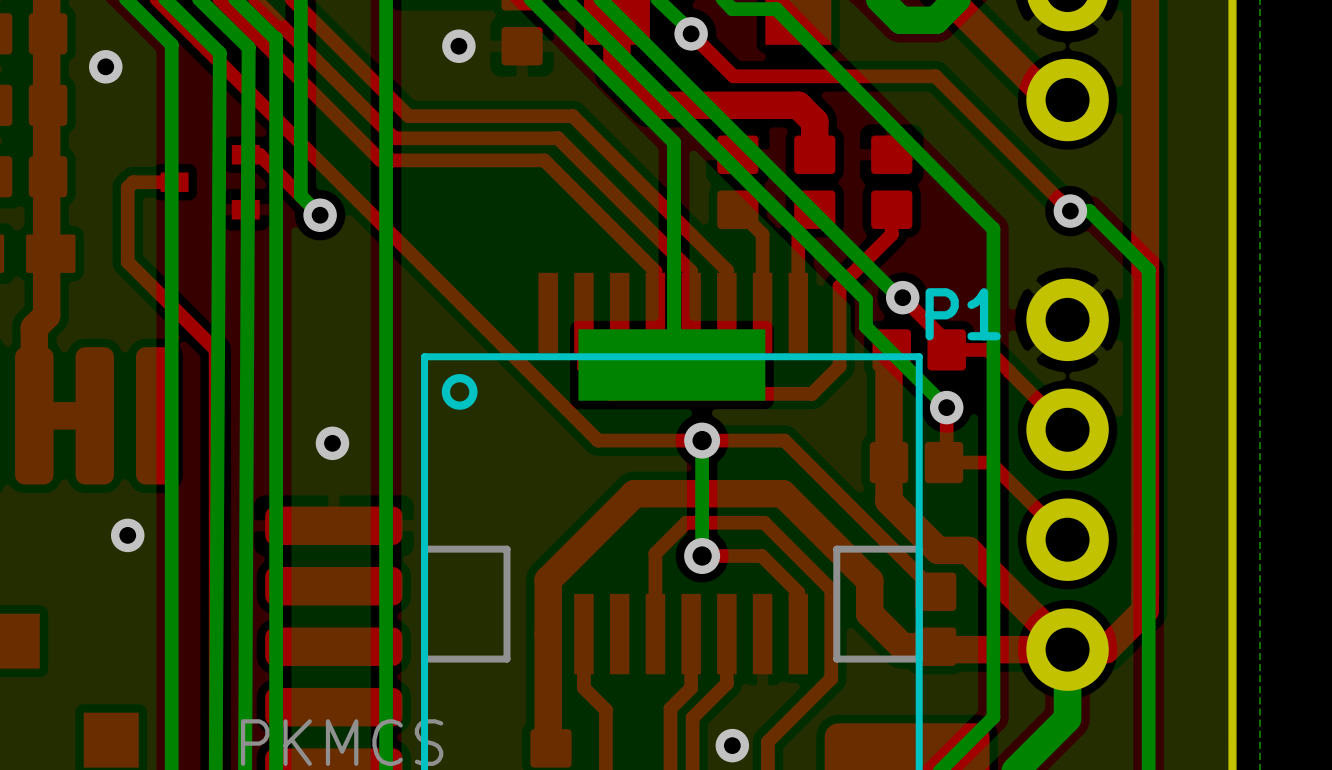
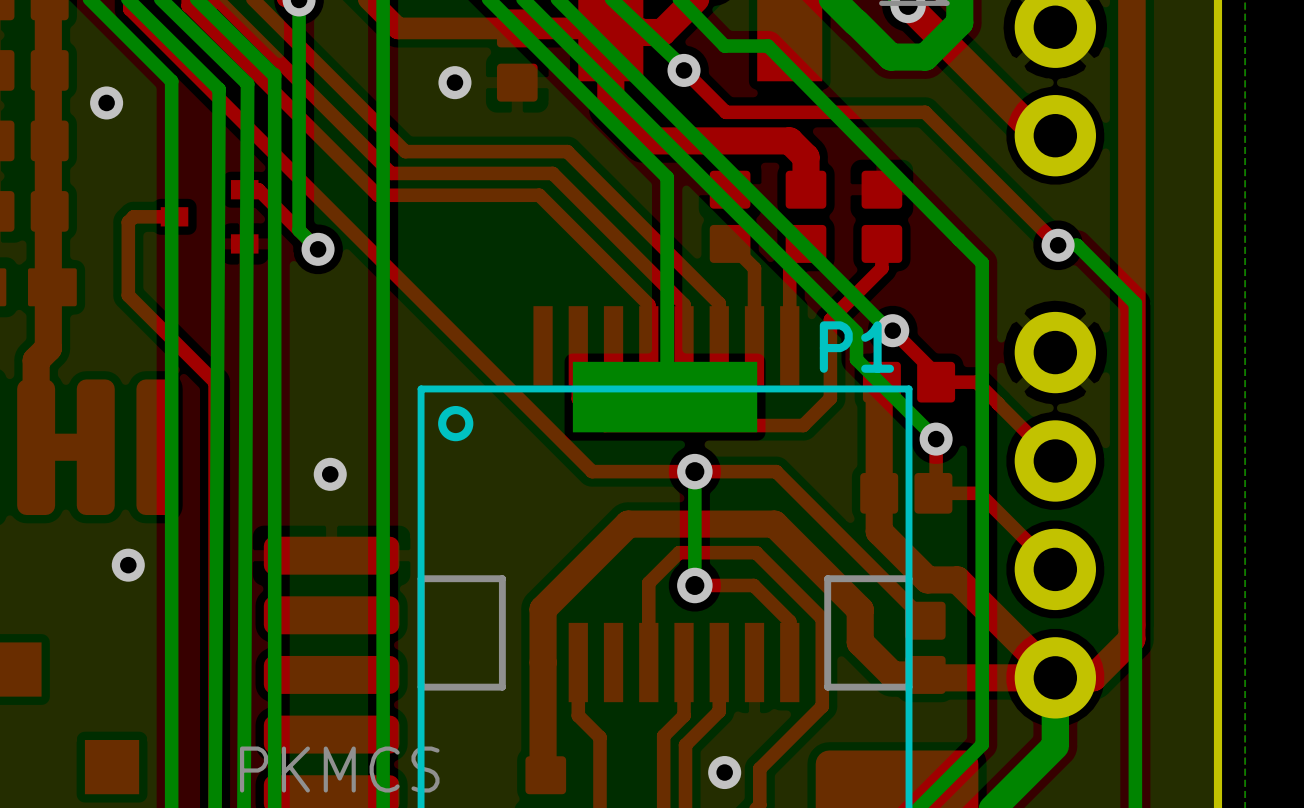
P1 name position: P1 (963, 314) -> P1 (856, 347)

